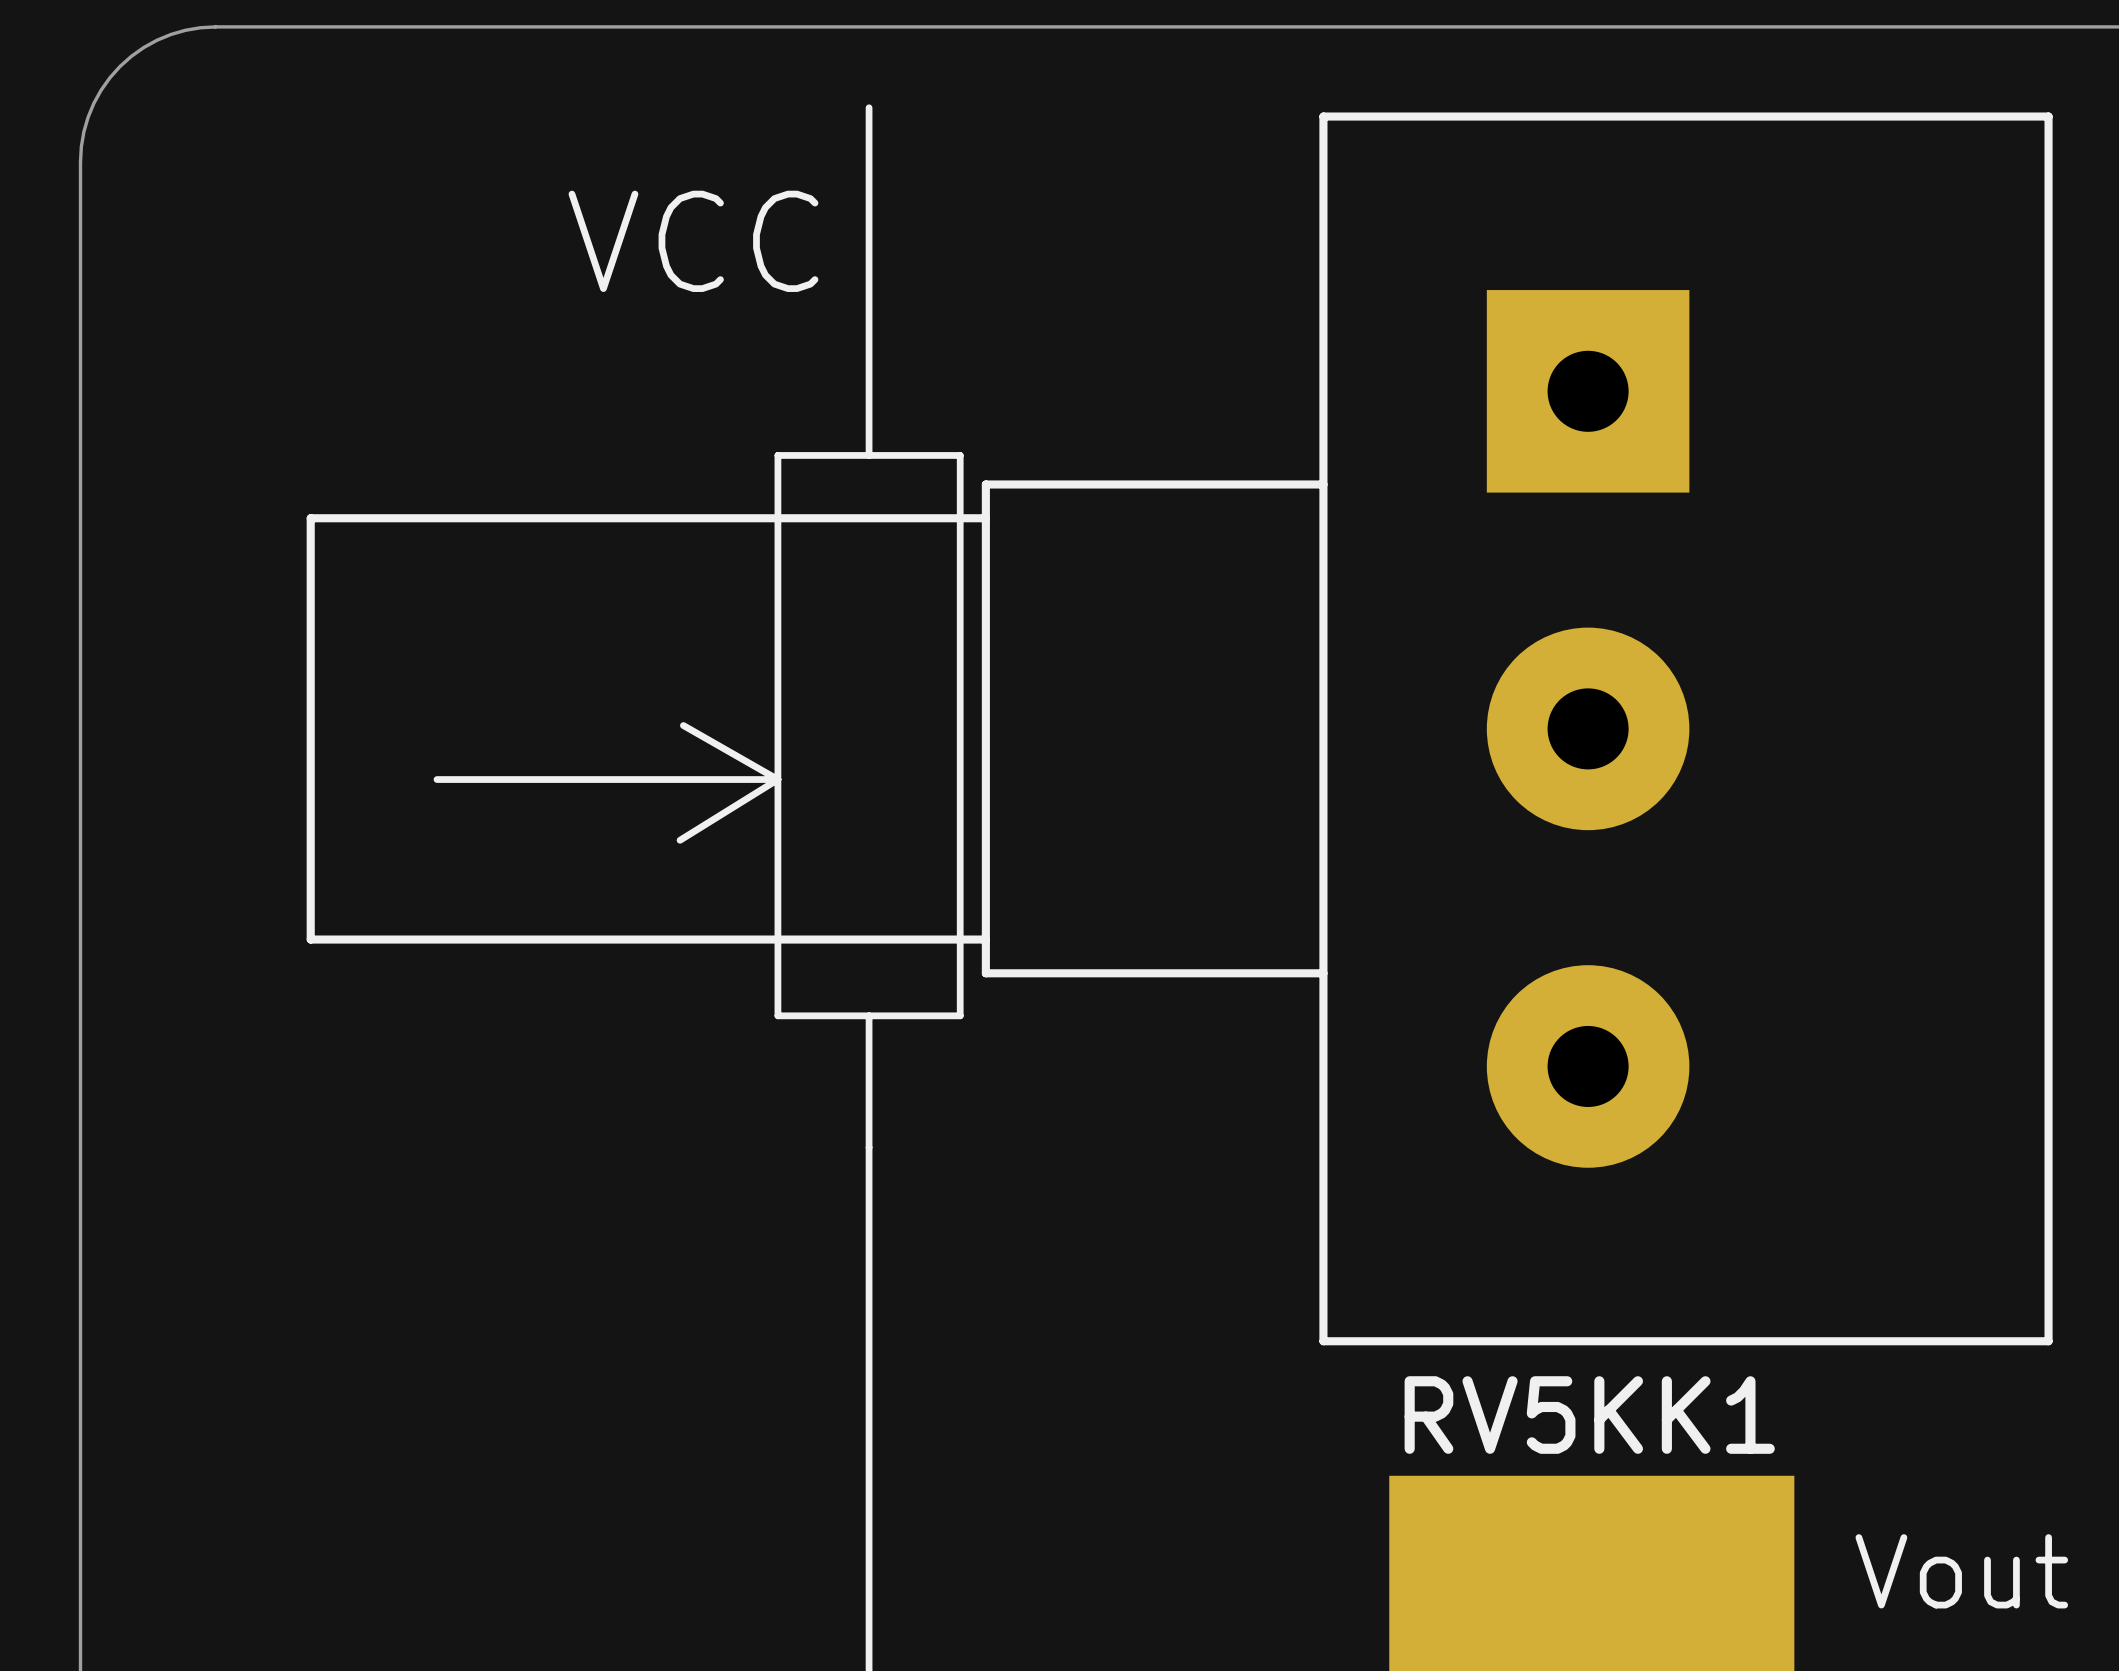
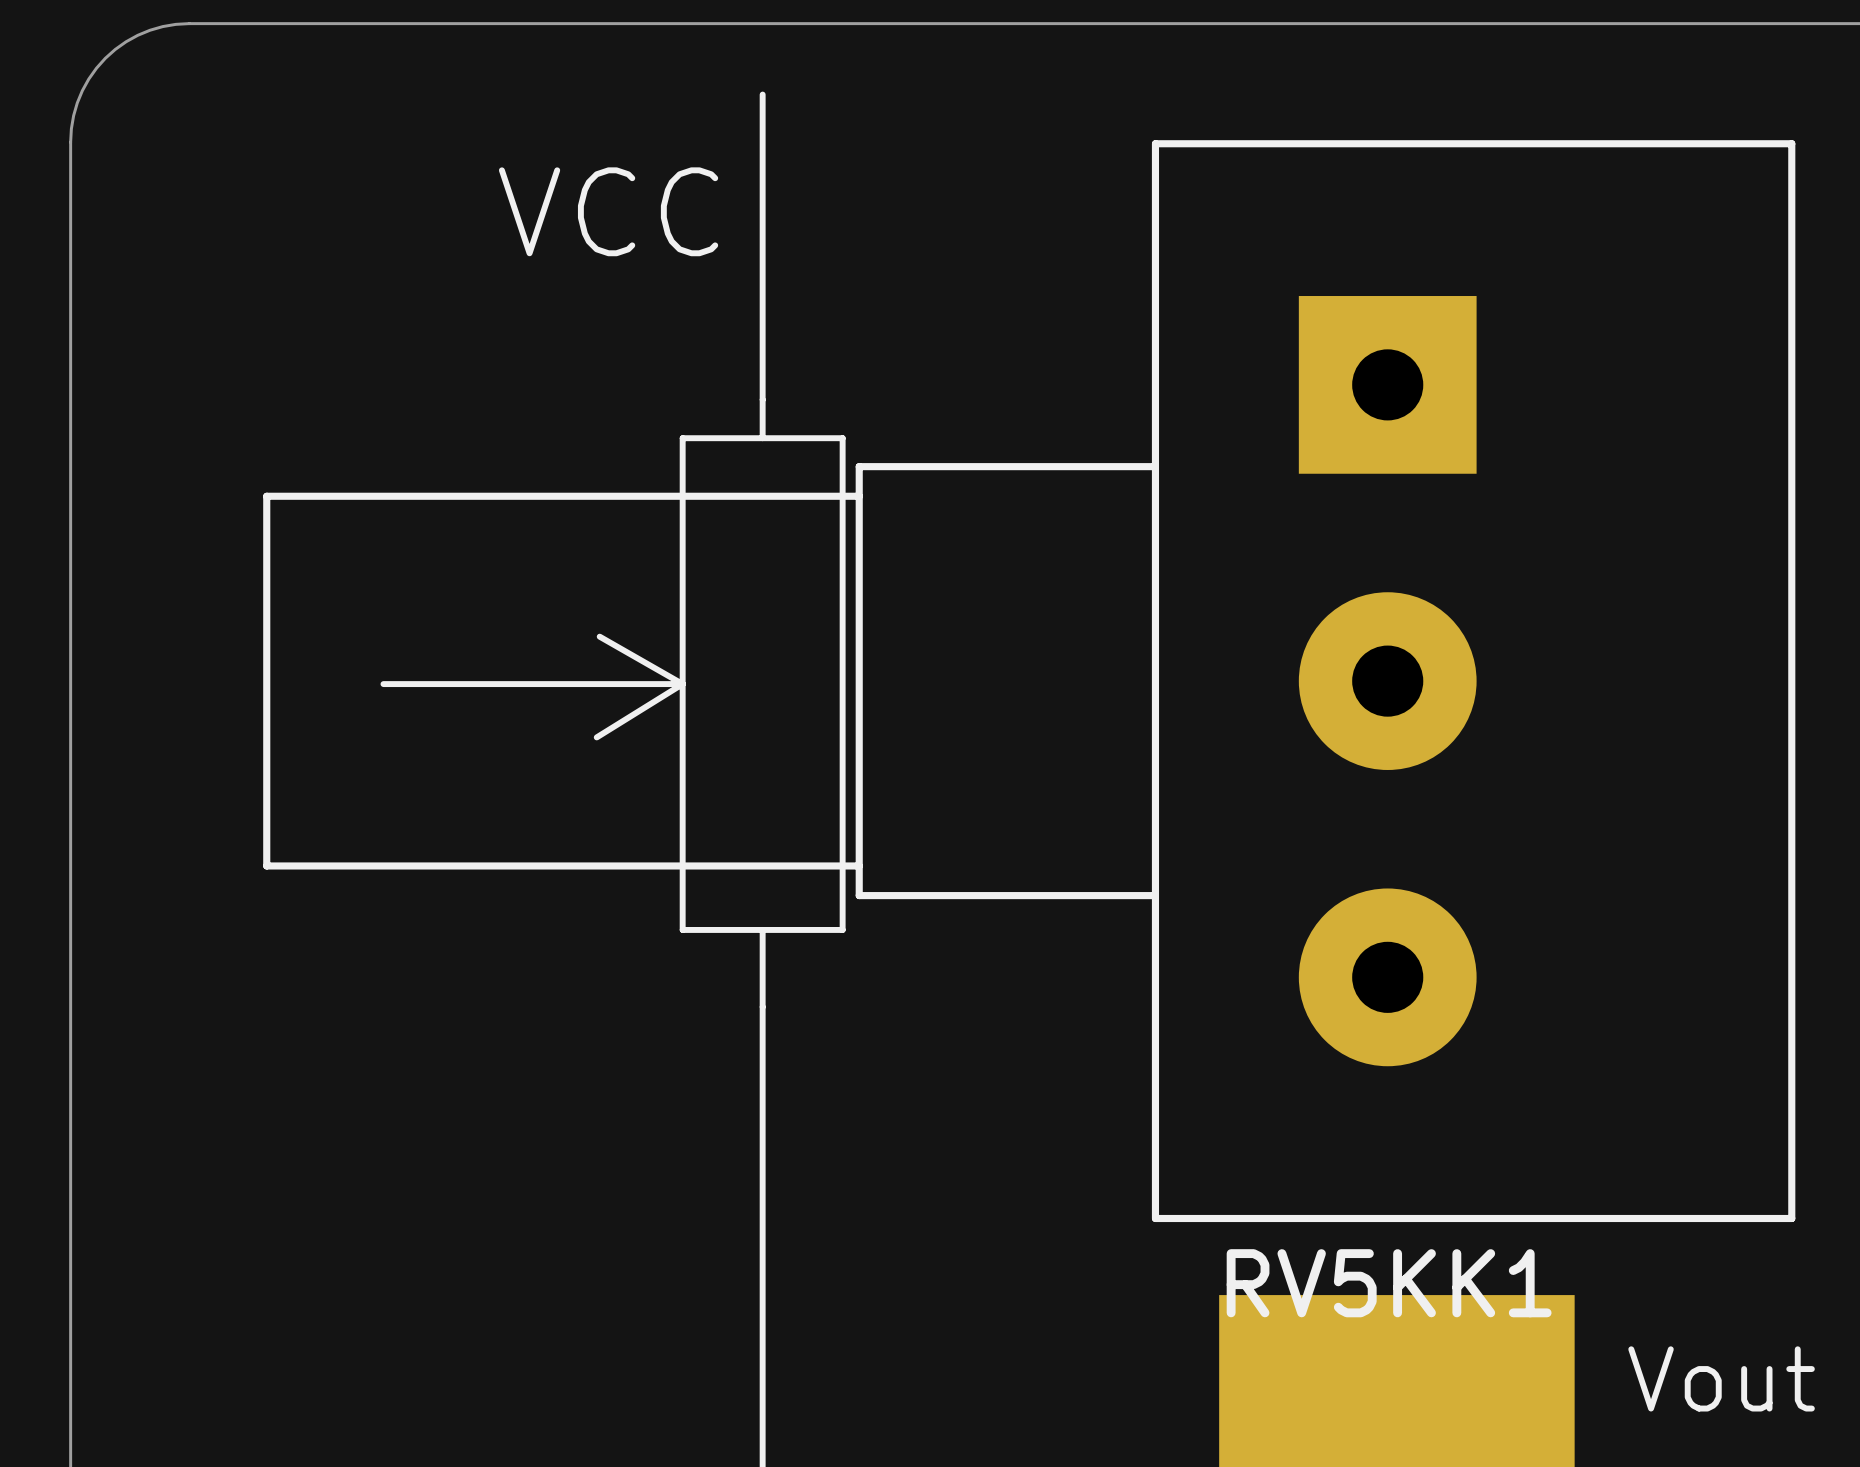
line: (777, 499) (777, 455) (960, 455) (960, 499) -> (682, 438) (842, 438)
RV5KK1 position: (1179, 728) -> (1029, 681)
line: (777, 1015) (960, 1015) -> (682, 891) (682, 929) (842, 929) (842, 891)
line: (869, 1015) (869, 1059) -> (762, 399) (762, 438)

